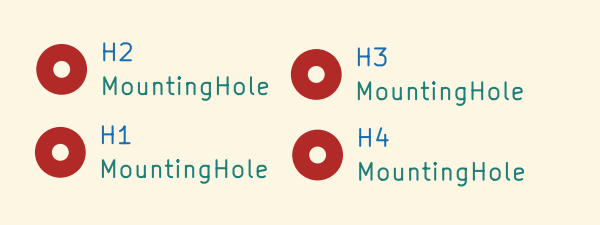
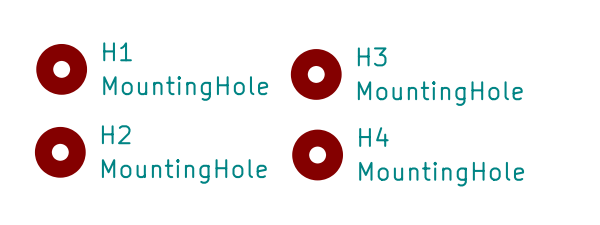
H2 name: H2 (117, 51) -> H1 (117, 51)
H1 name: H1 (116, 134) -> H2 (116, 134)

